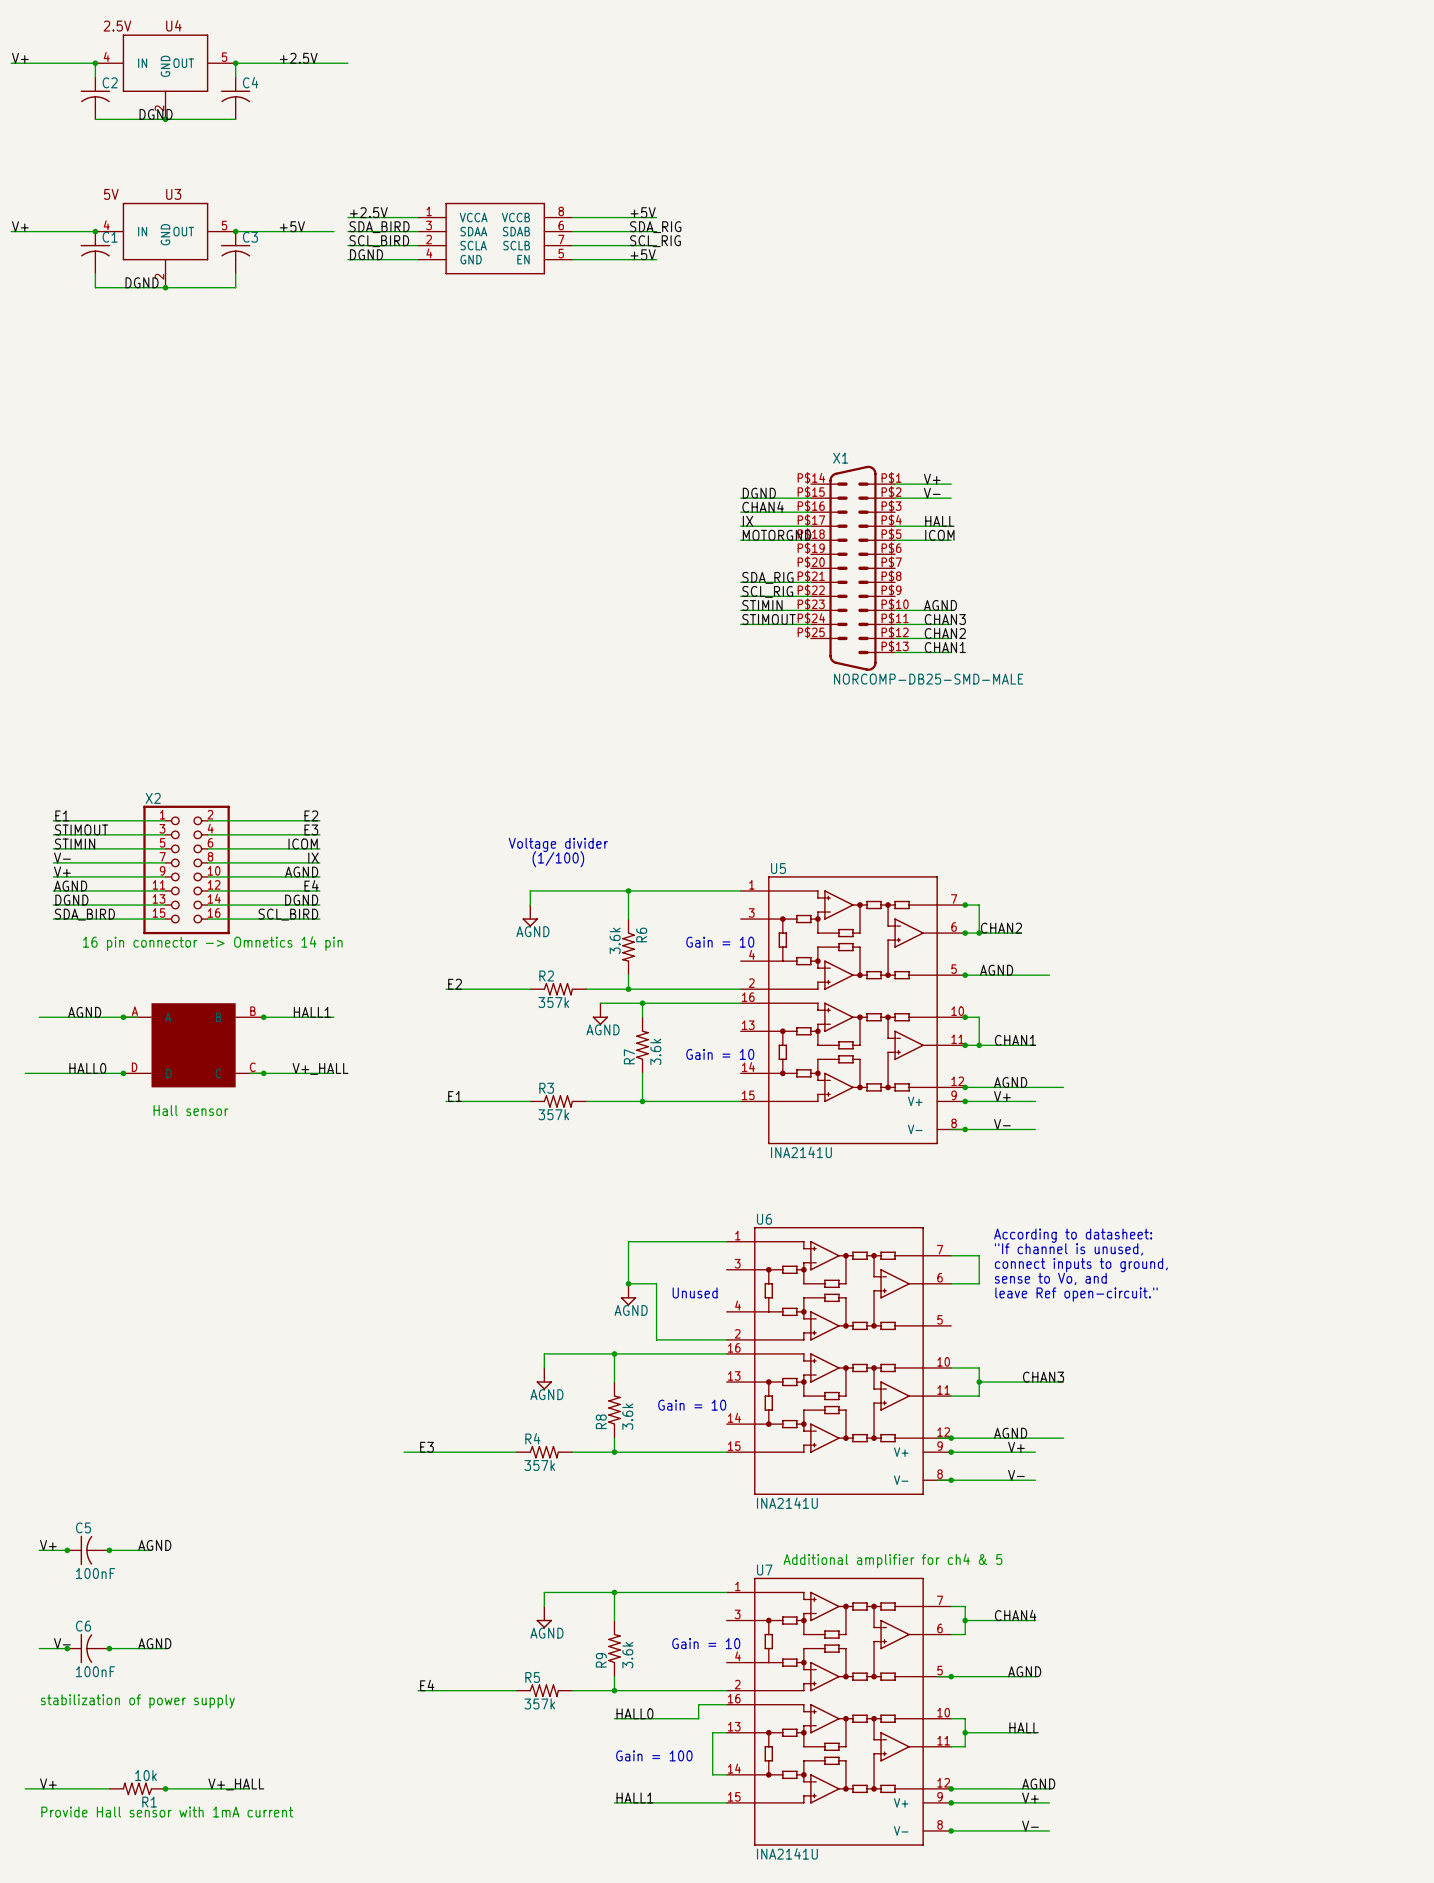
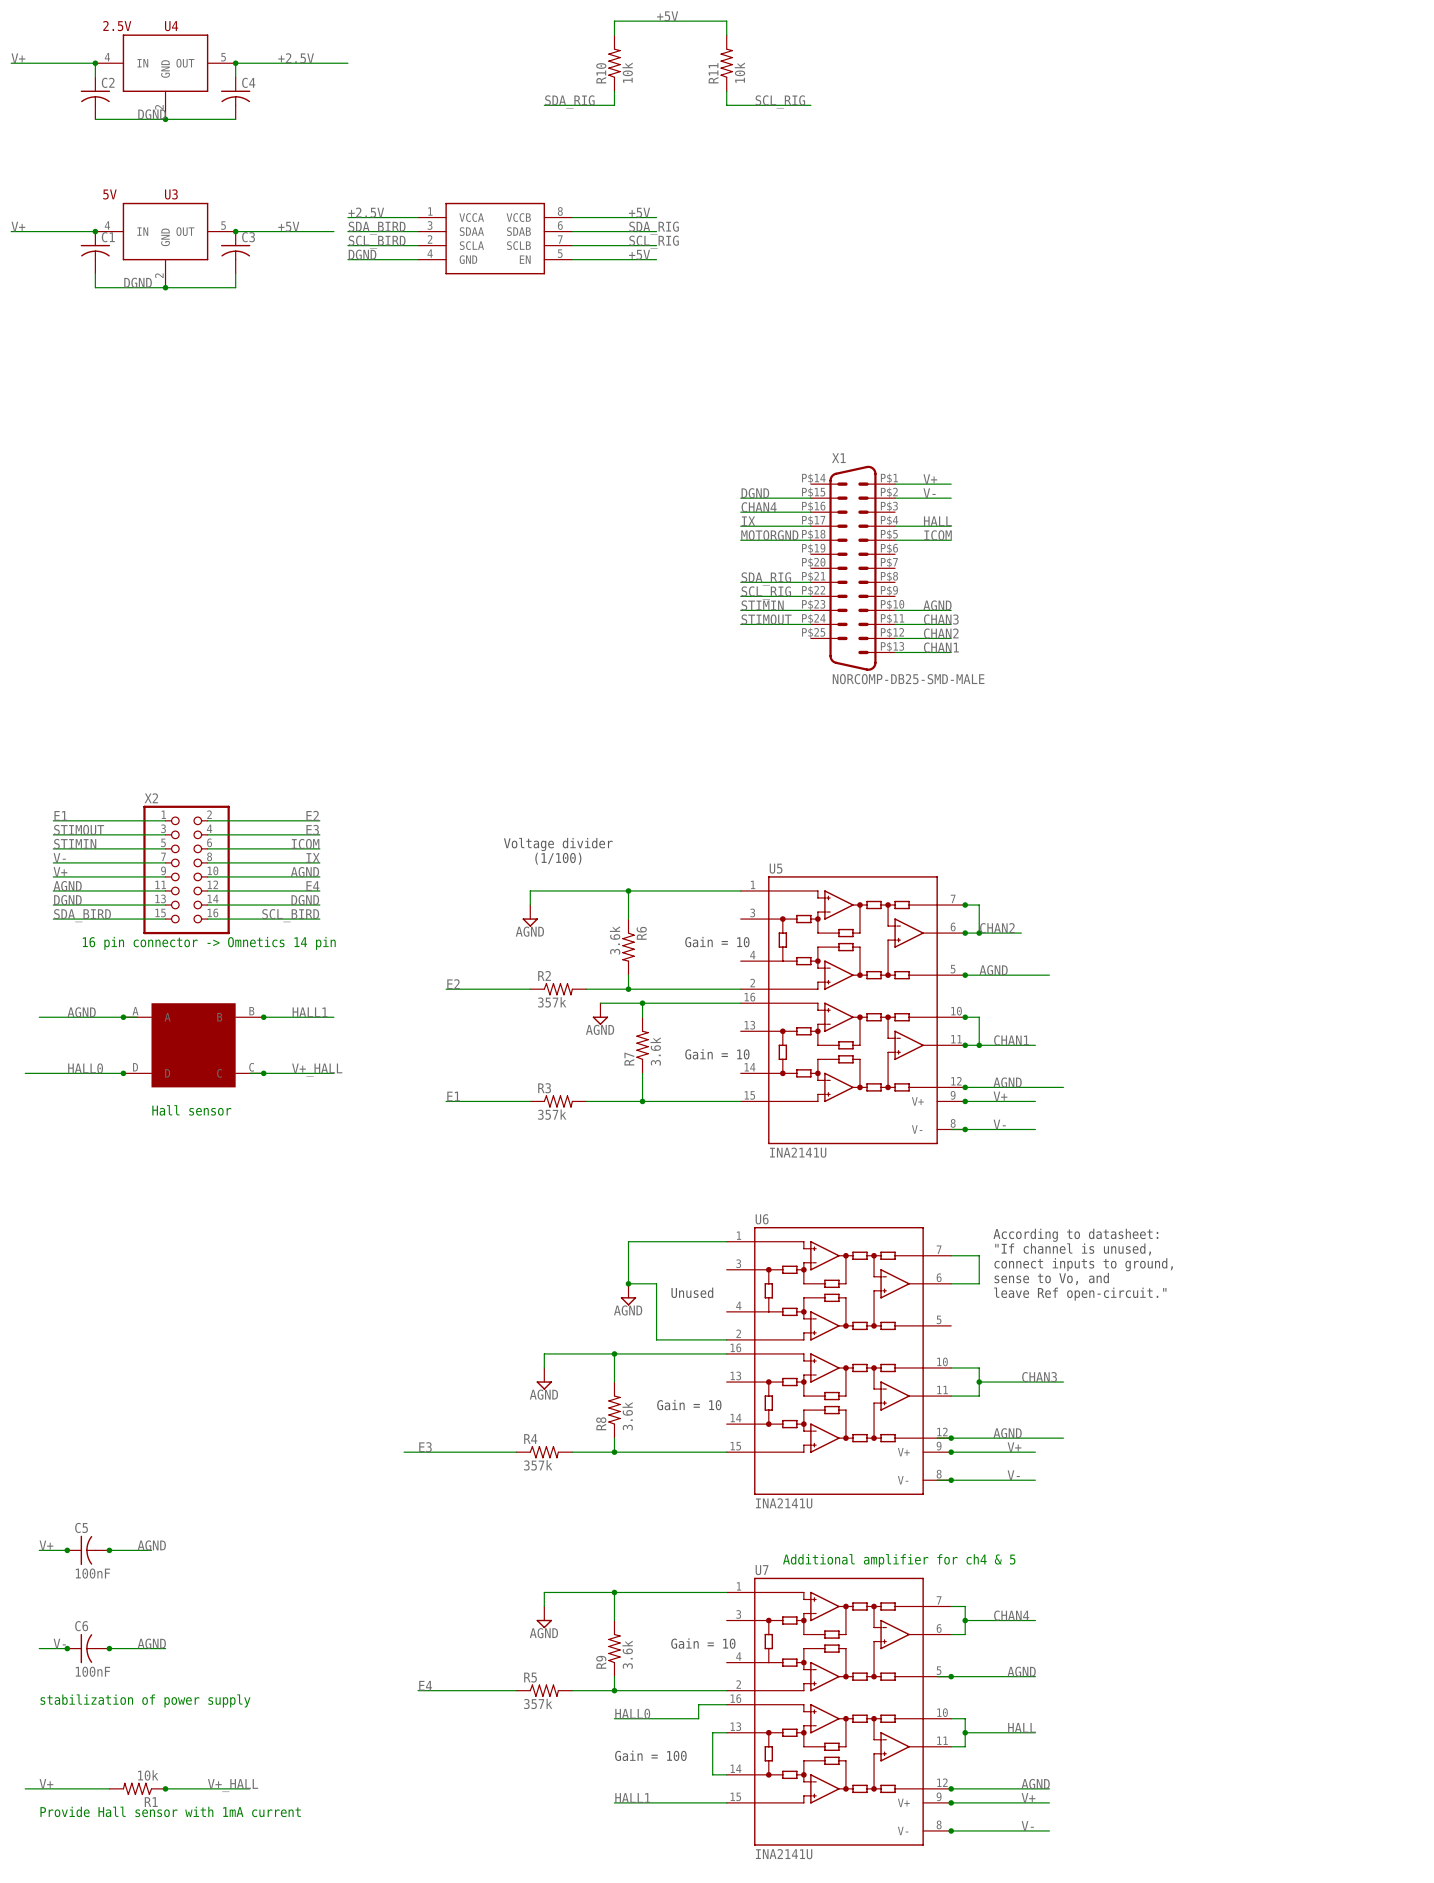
label: none -> +5V (667, 16)
wire: none -> (614, 35) (614, 21) (726, 21) (726, 35)
R10: none -> 10k (614, 63)
R11: none -> 10k (726, 63)
wire: none -> (614, 91) (614, 105) (544, 105)
wire: none -> (726, 91) (726, 105) (810, 105)
label: none -> SDA_RIG (569, 101)
label: none -> SCL_RIG (780, 101)

